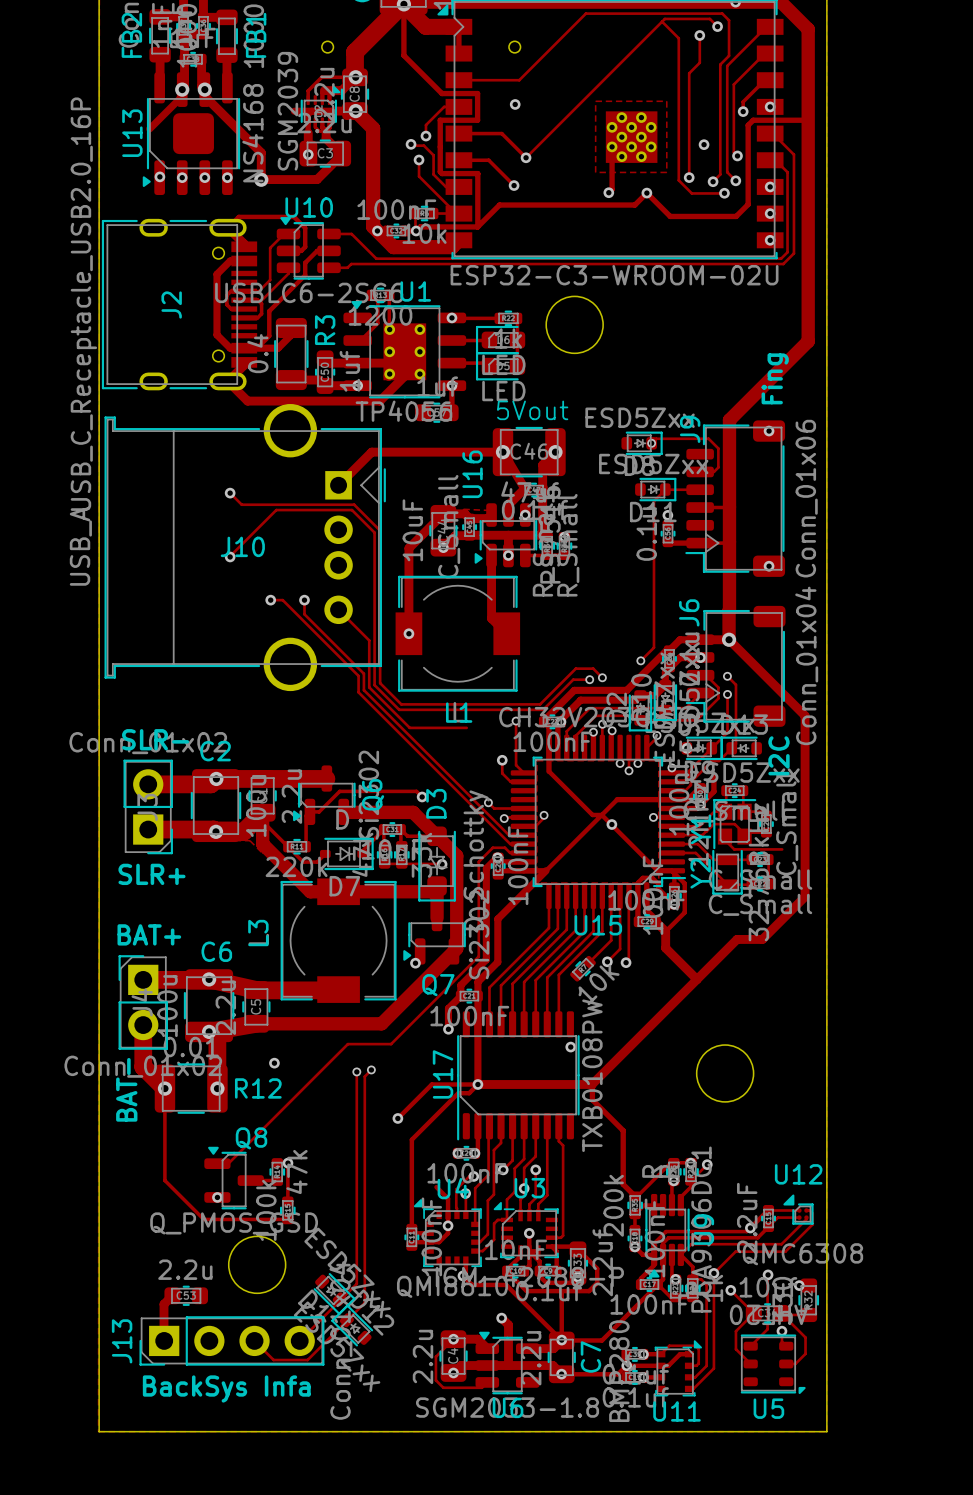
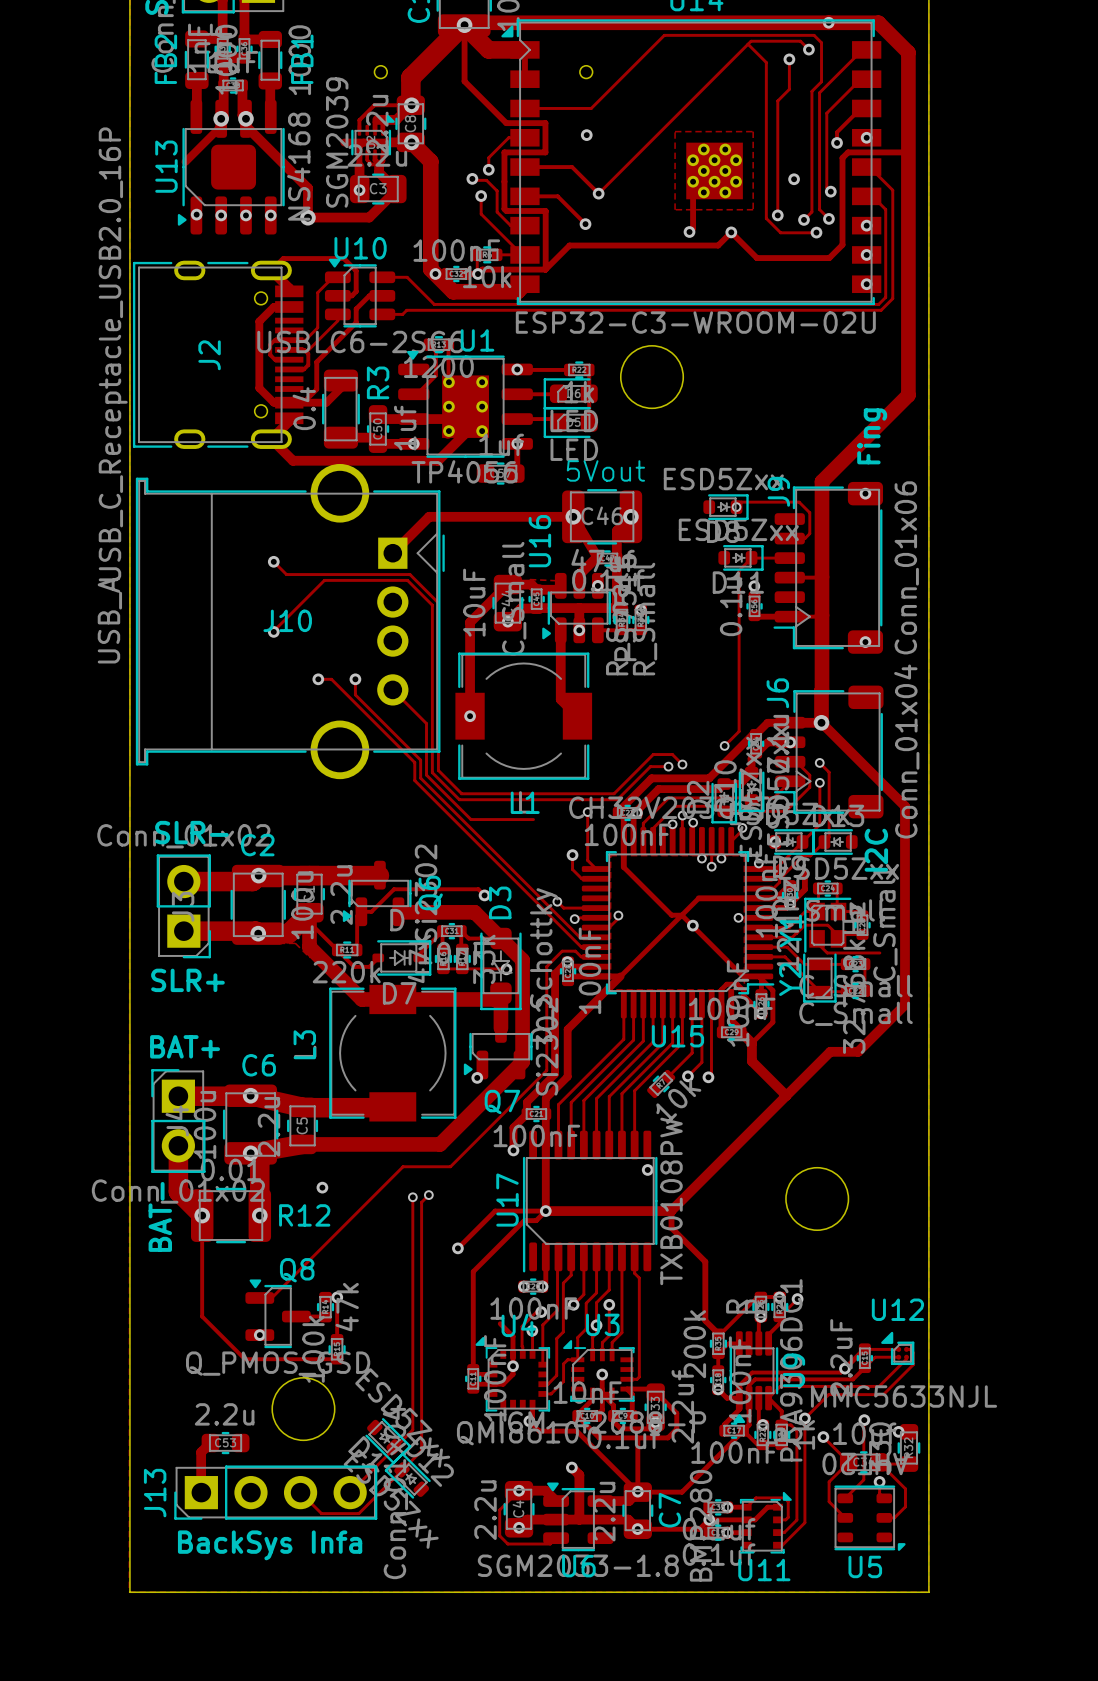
U12 value: QMC6308 (802, 1254) -> MMC5633NJL (904, 1396)

